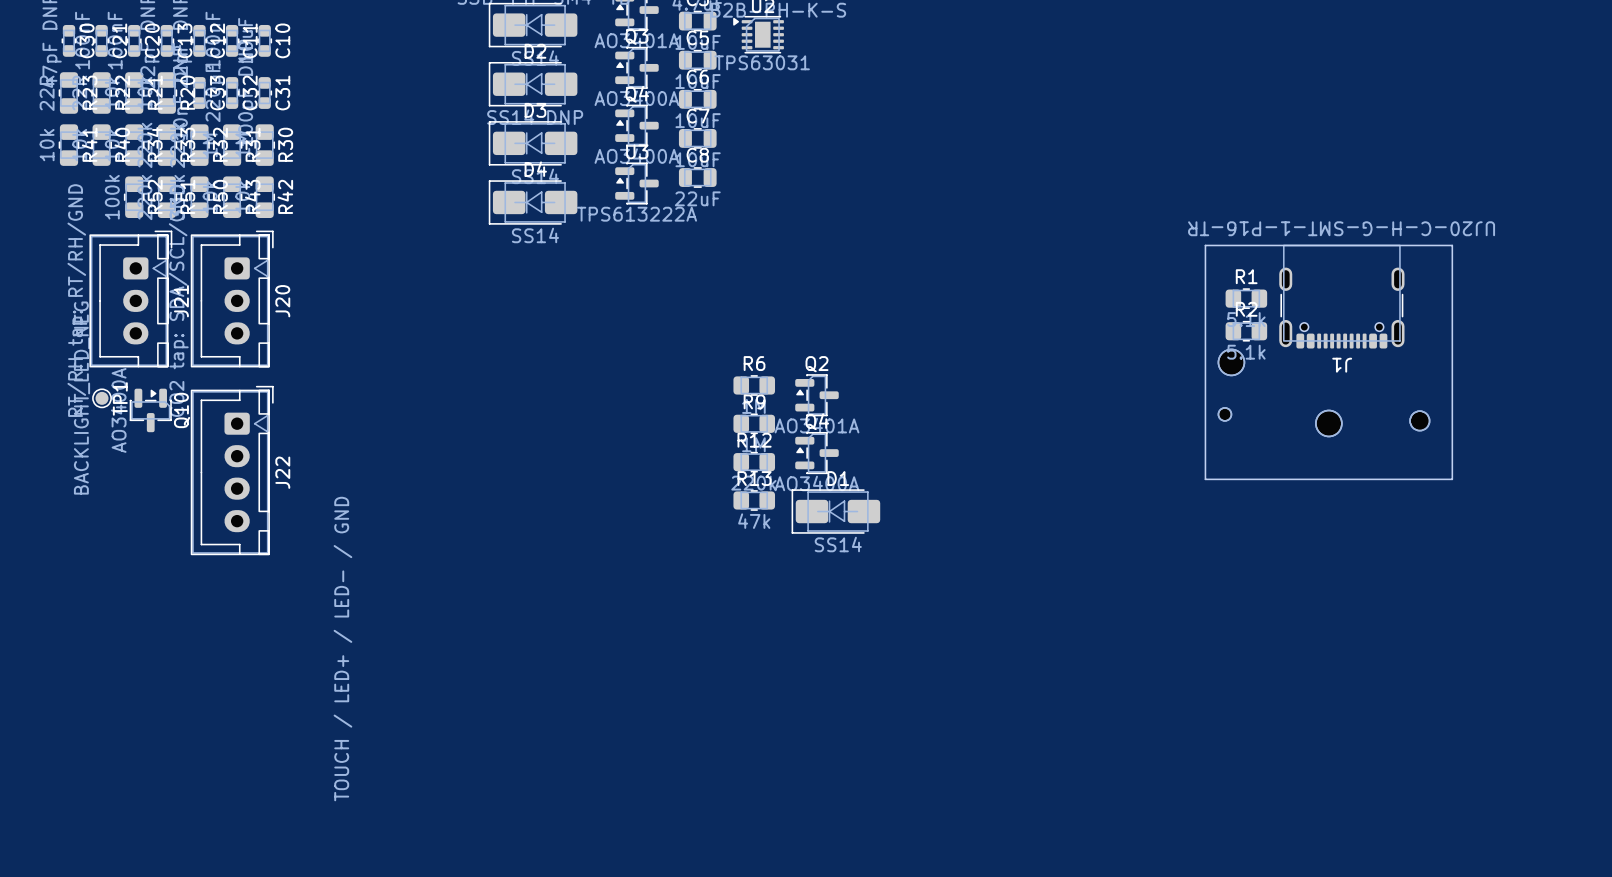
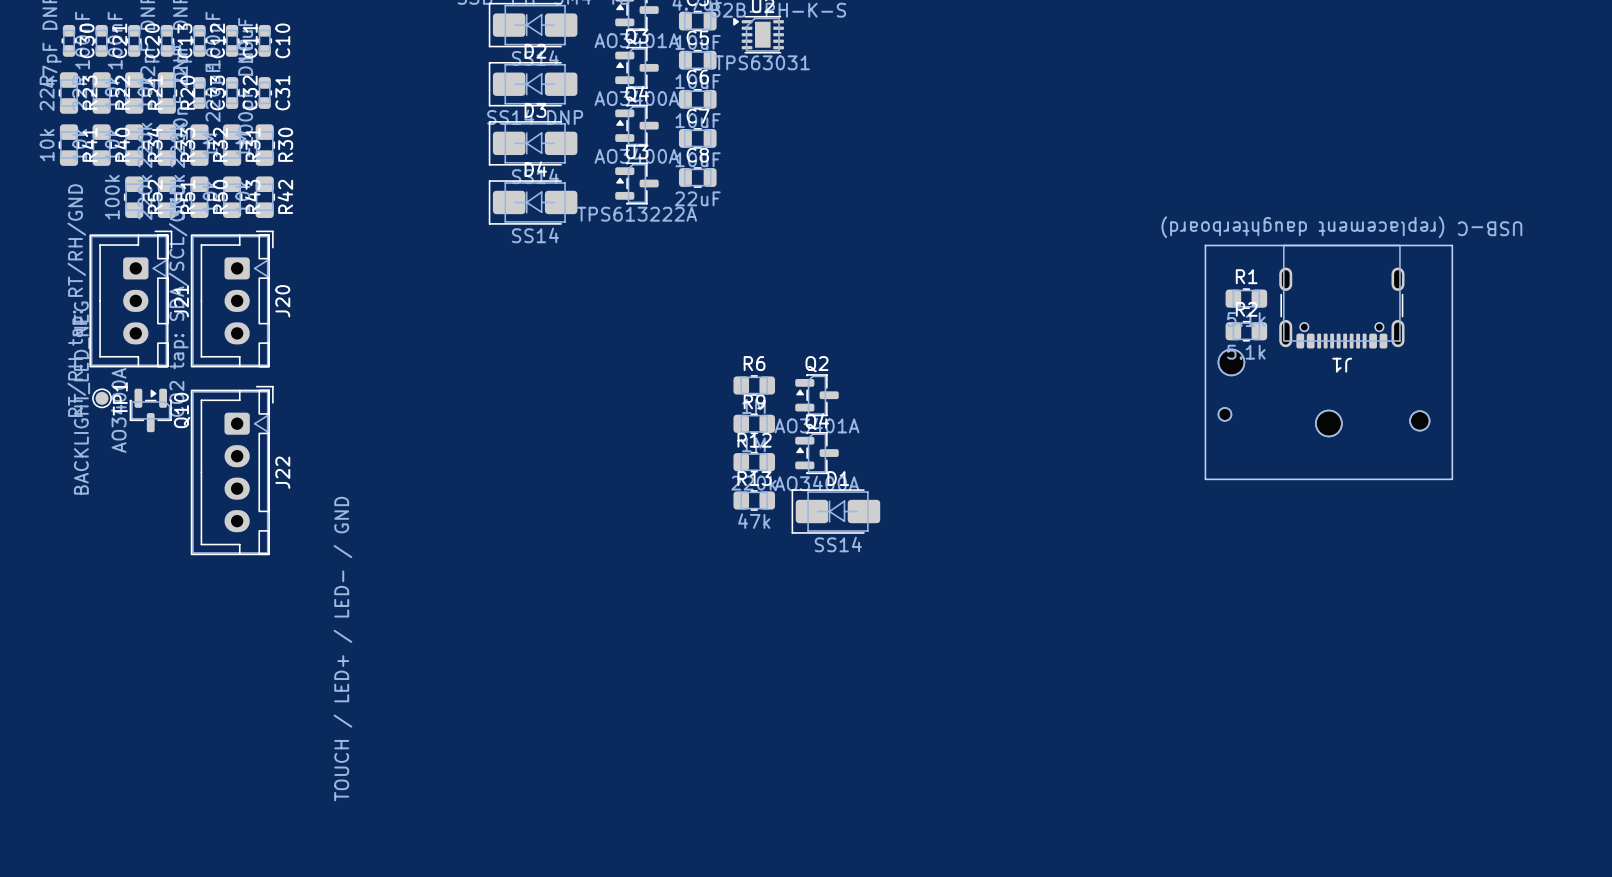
J1 value: UJ20-C-H-G-SMT-1-P16-TR (1341, 228) -> USB-C (replacement daughterboard) (1341, 227)

